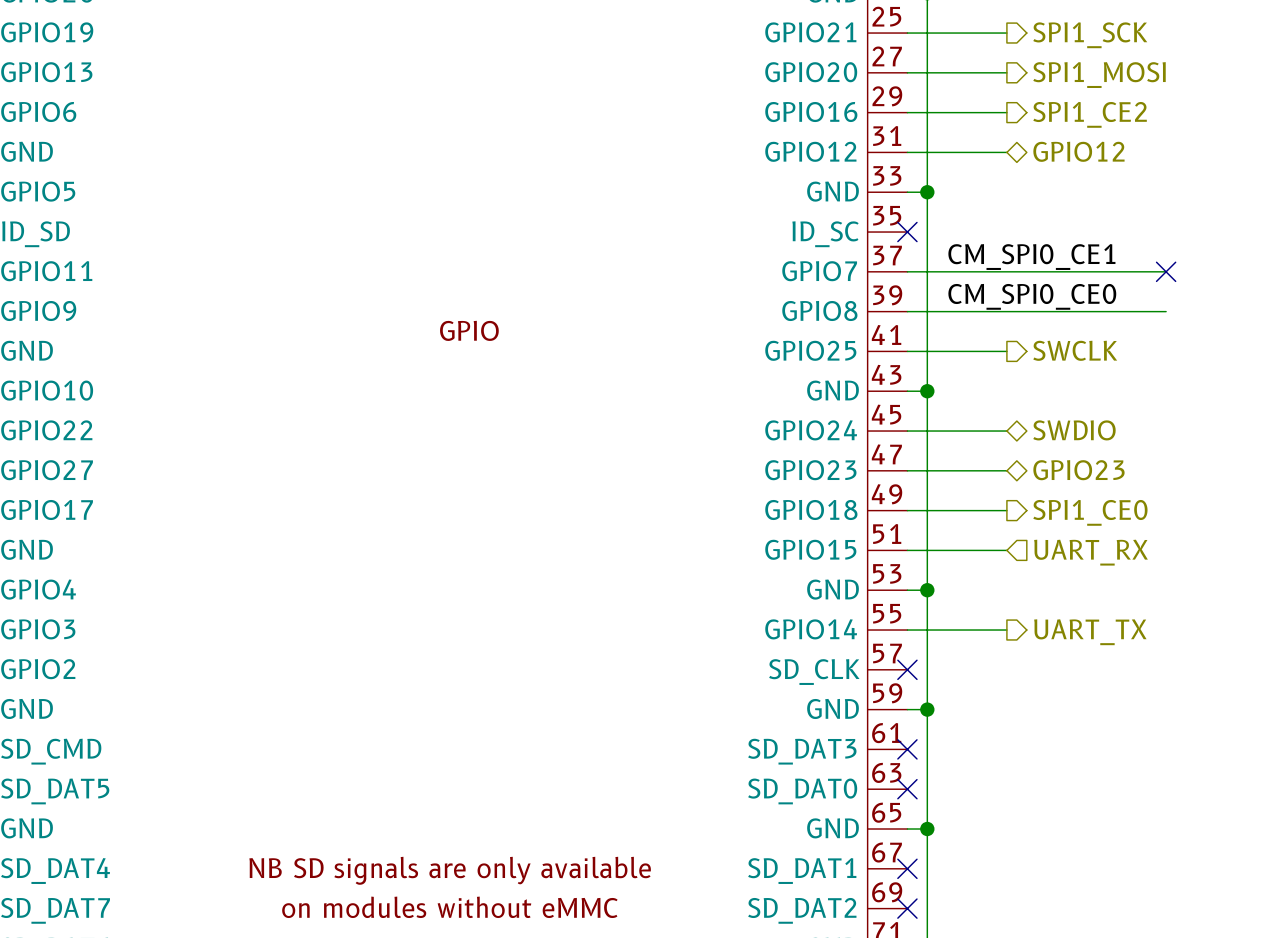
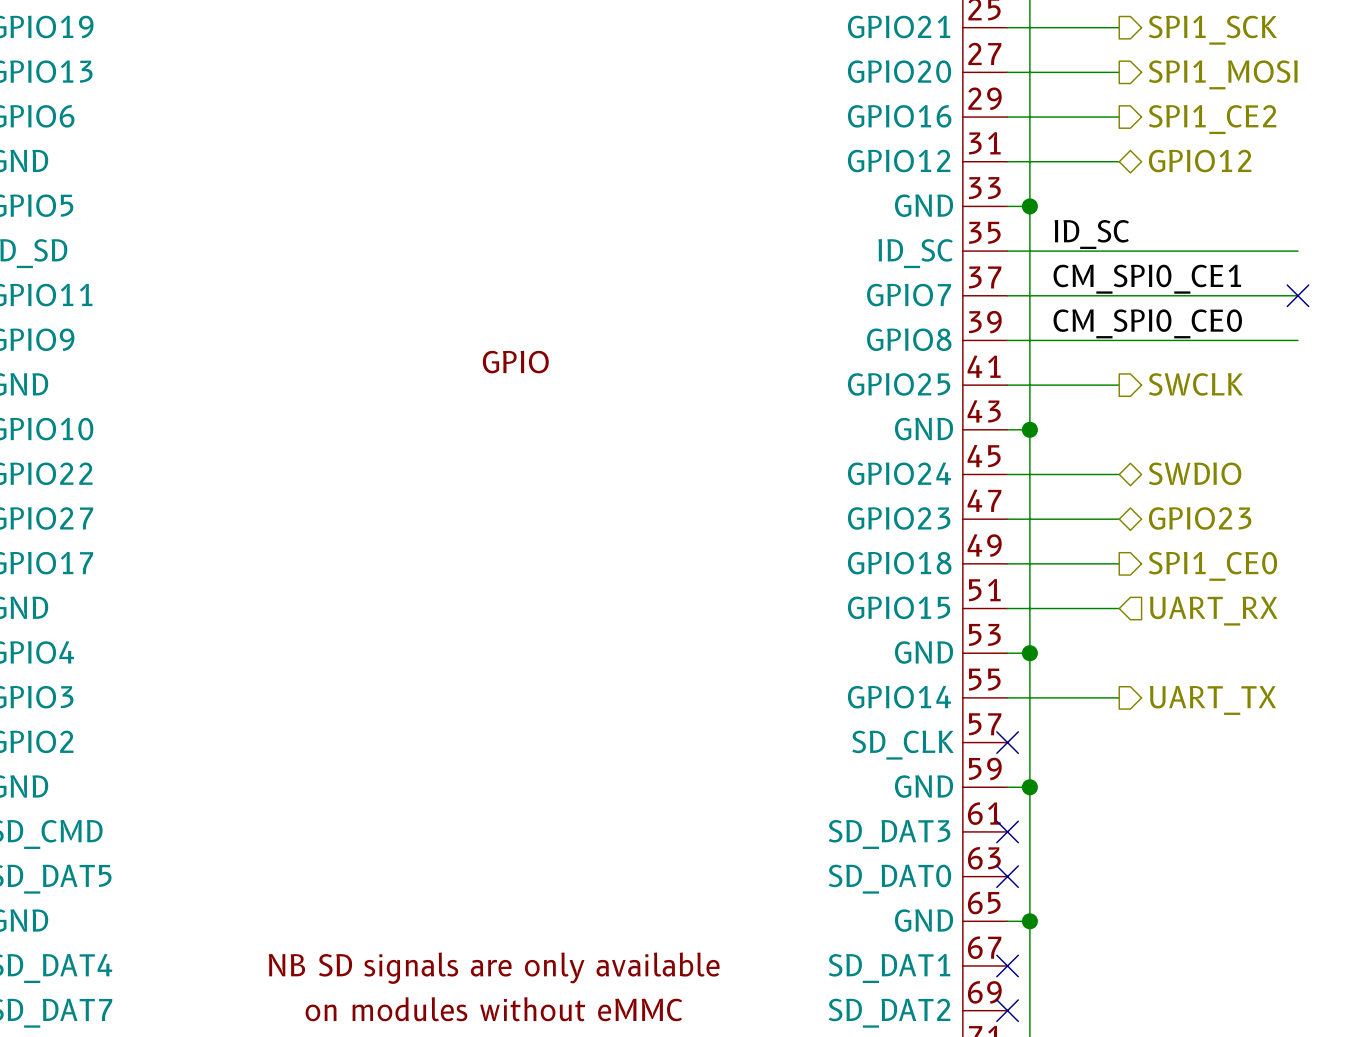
label: none -> ID_SC (1091, 234)
wire: none -> (1007, 251) (1297, 251)
no-connect mark: (907, 232) -> none

